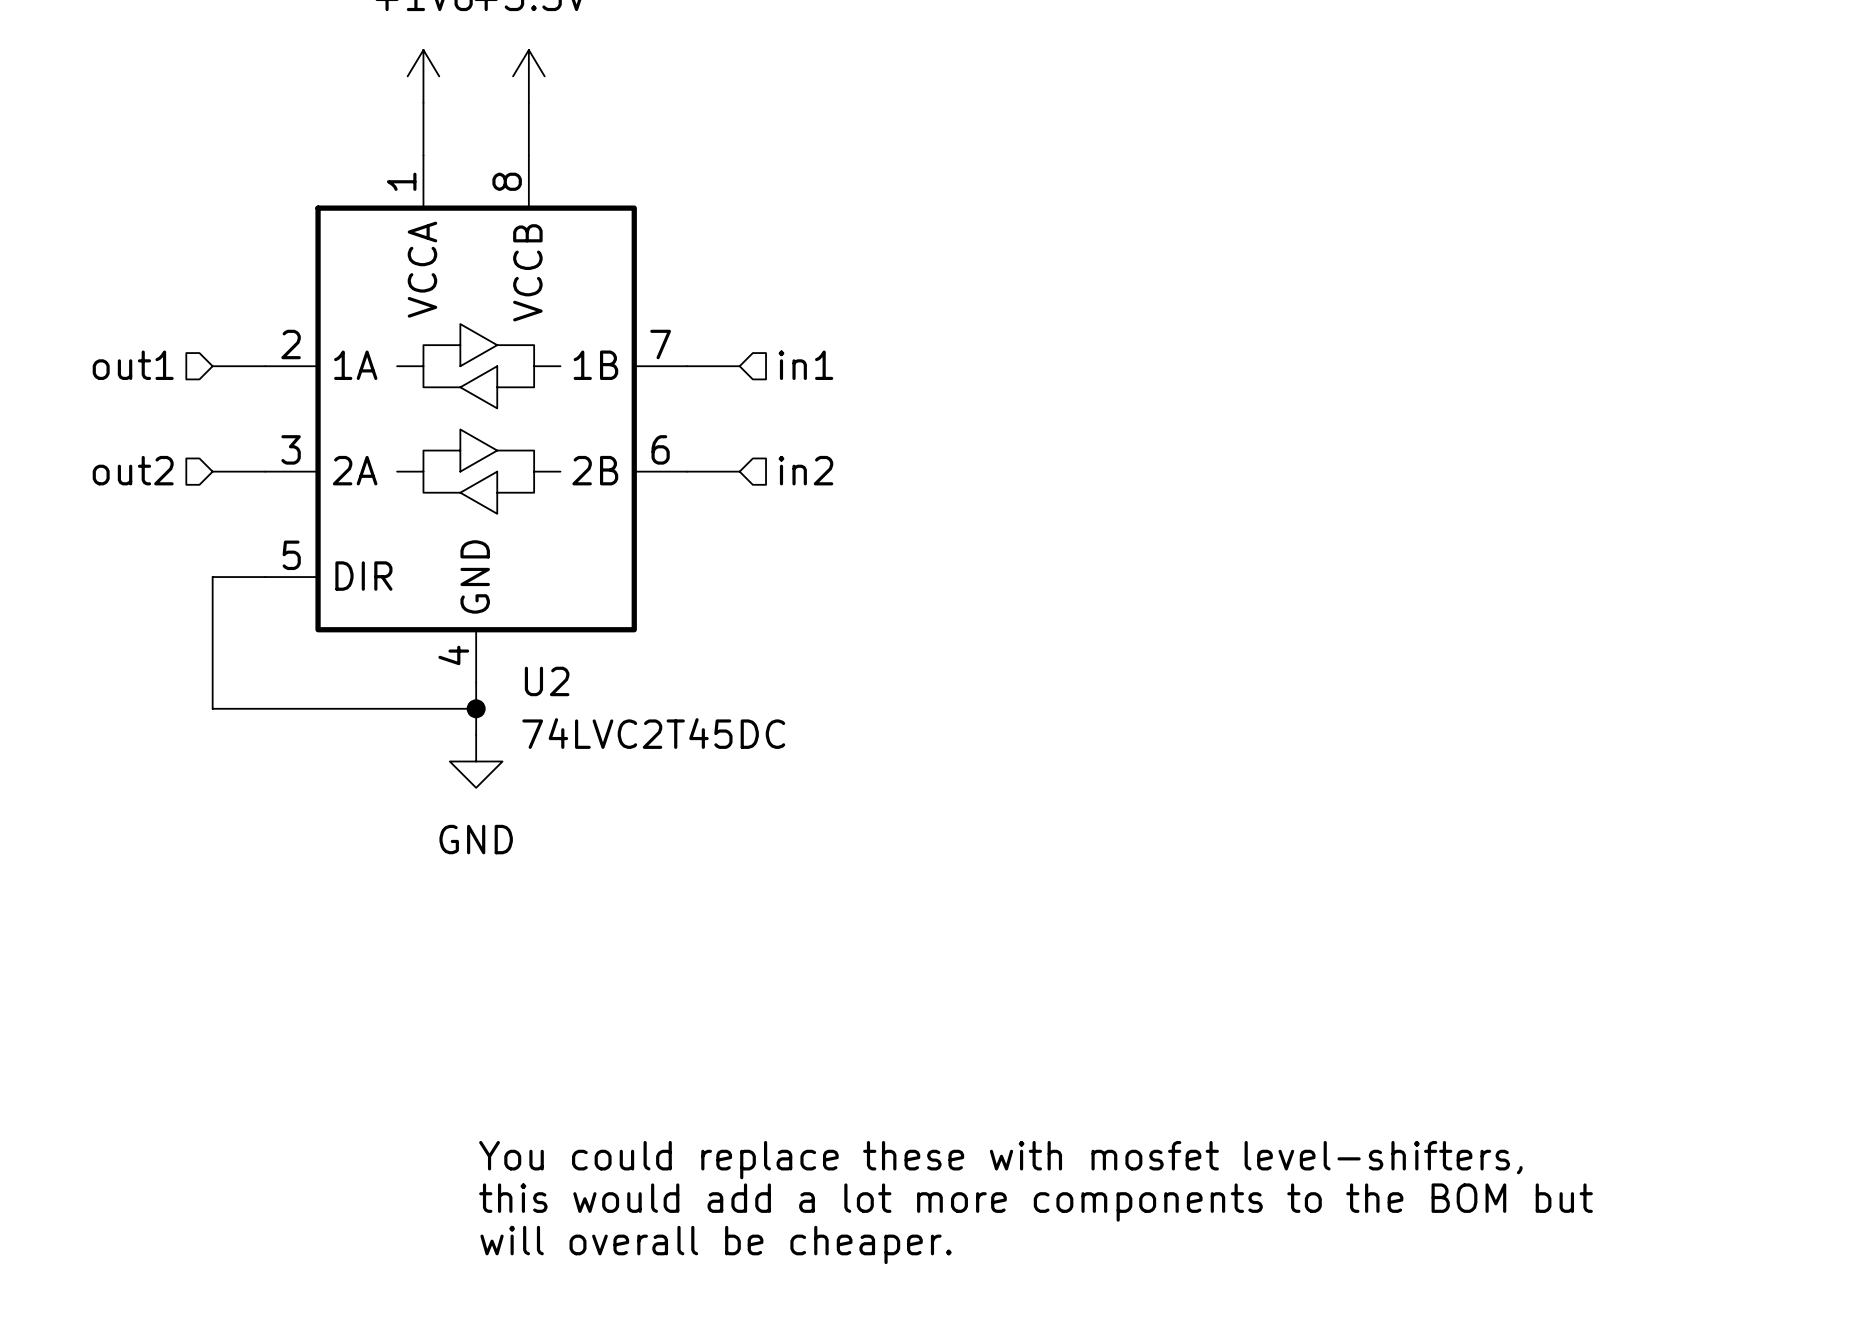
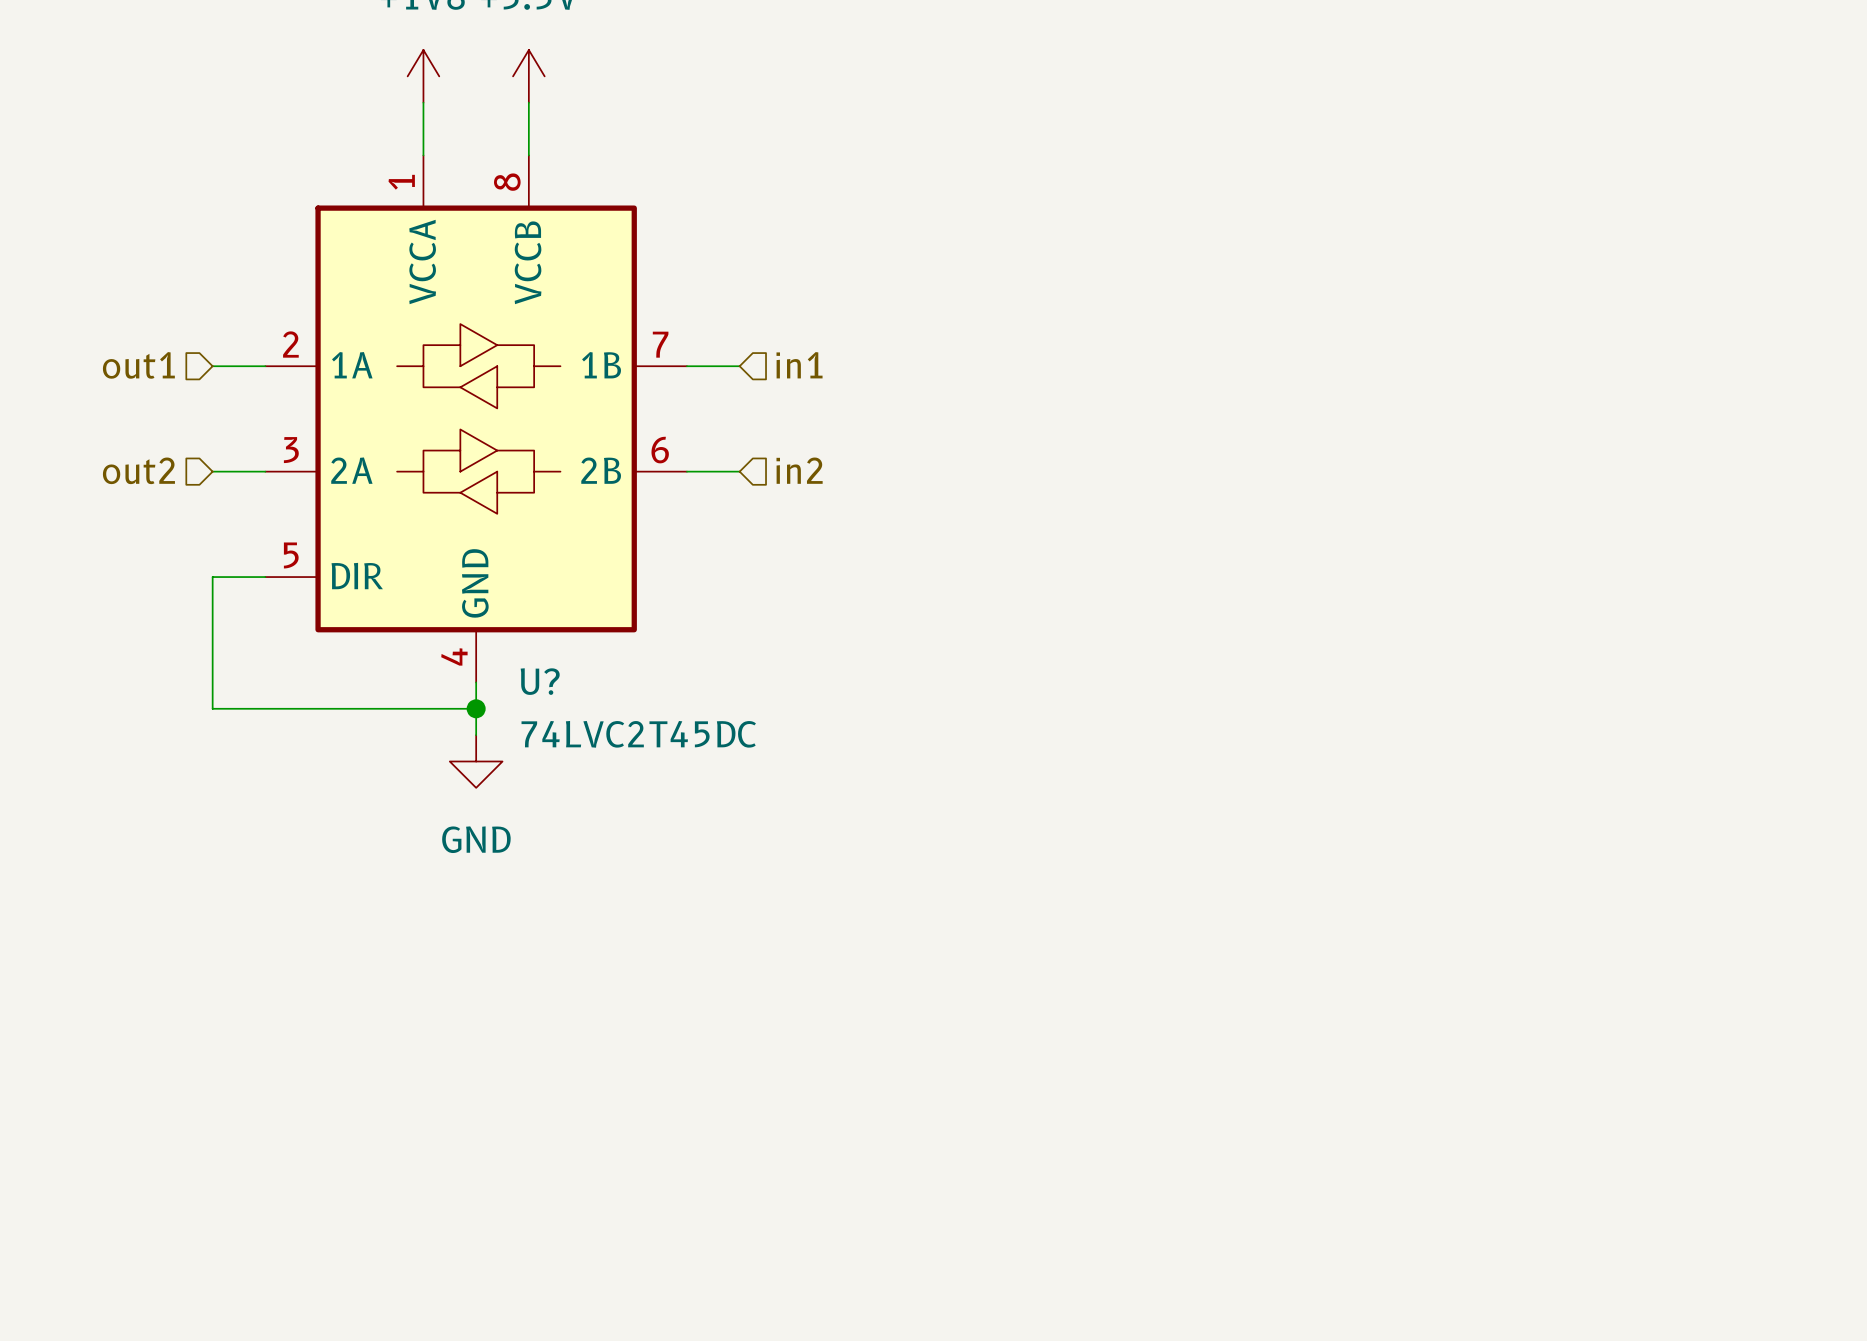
U2 name: U2 (547, 681) -> U? (540, 681)
text: You could replace these with mosfet level-shifters, (1000, 1160) -> none
text: this would add a lot more components to the BOM but (1036, 1202) -> none
text: will overall be cheaper. (716, 1244) -> none

